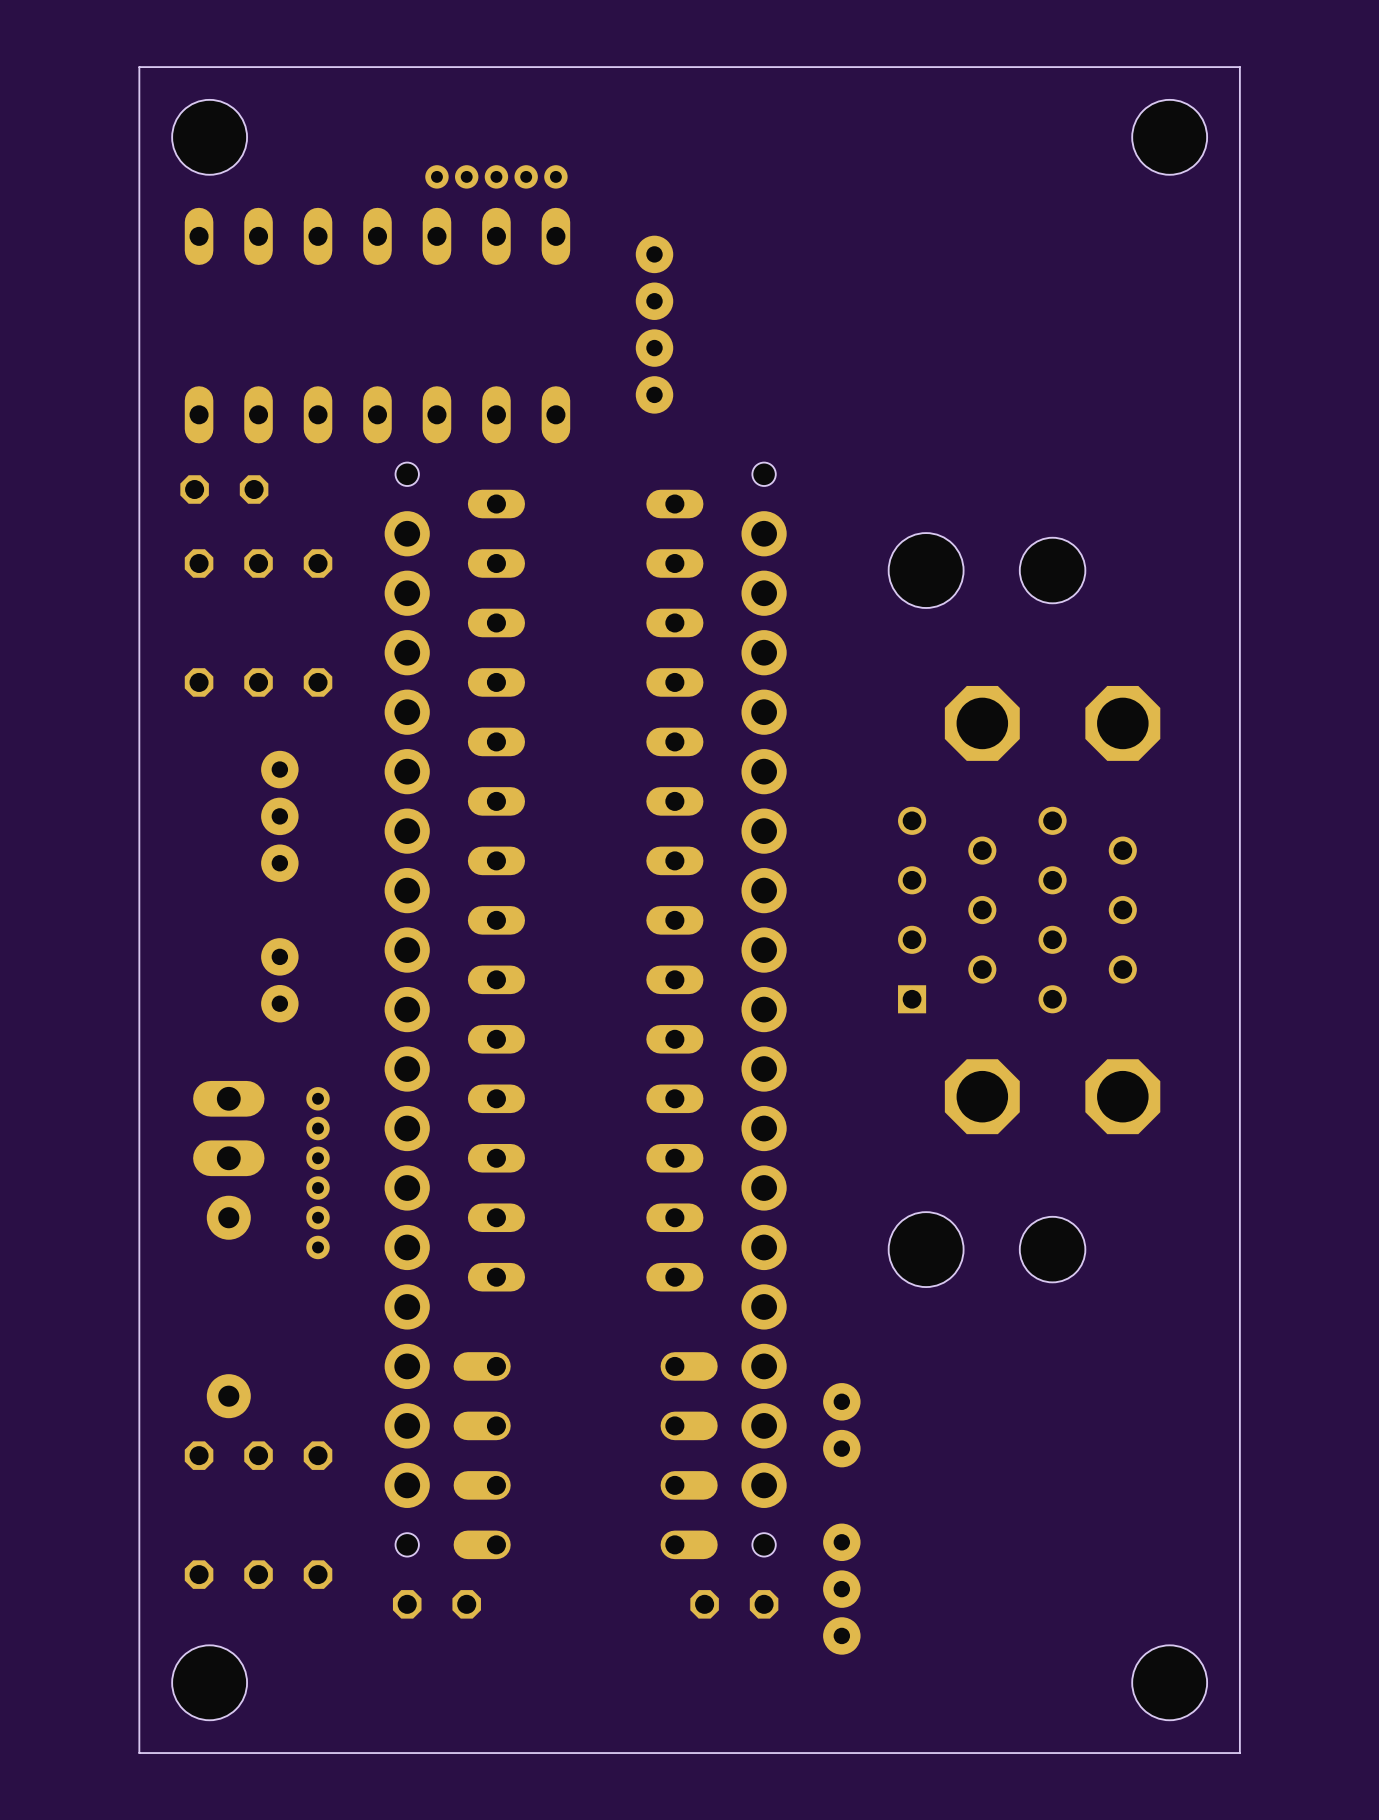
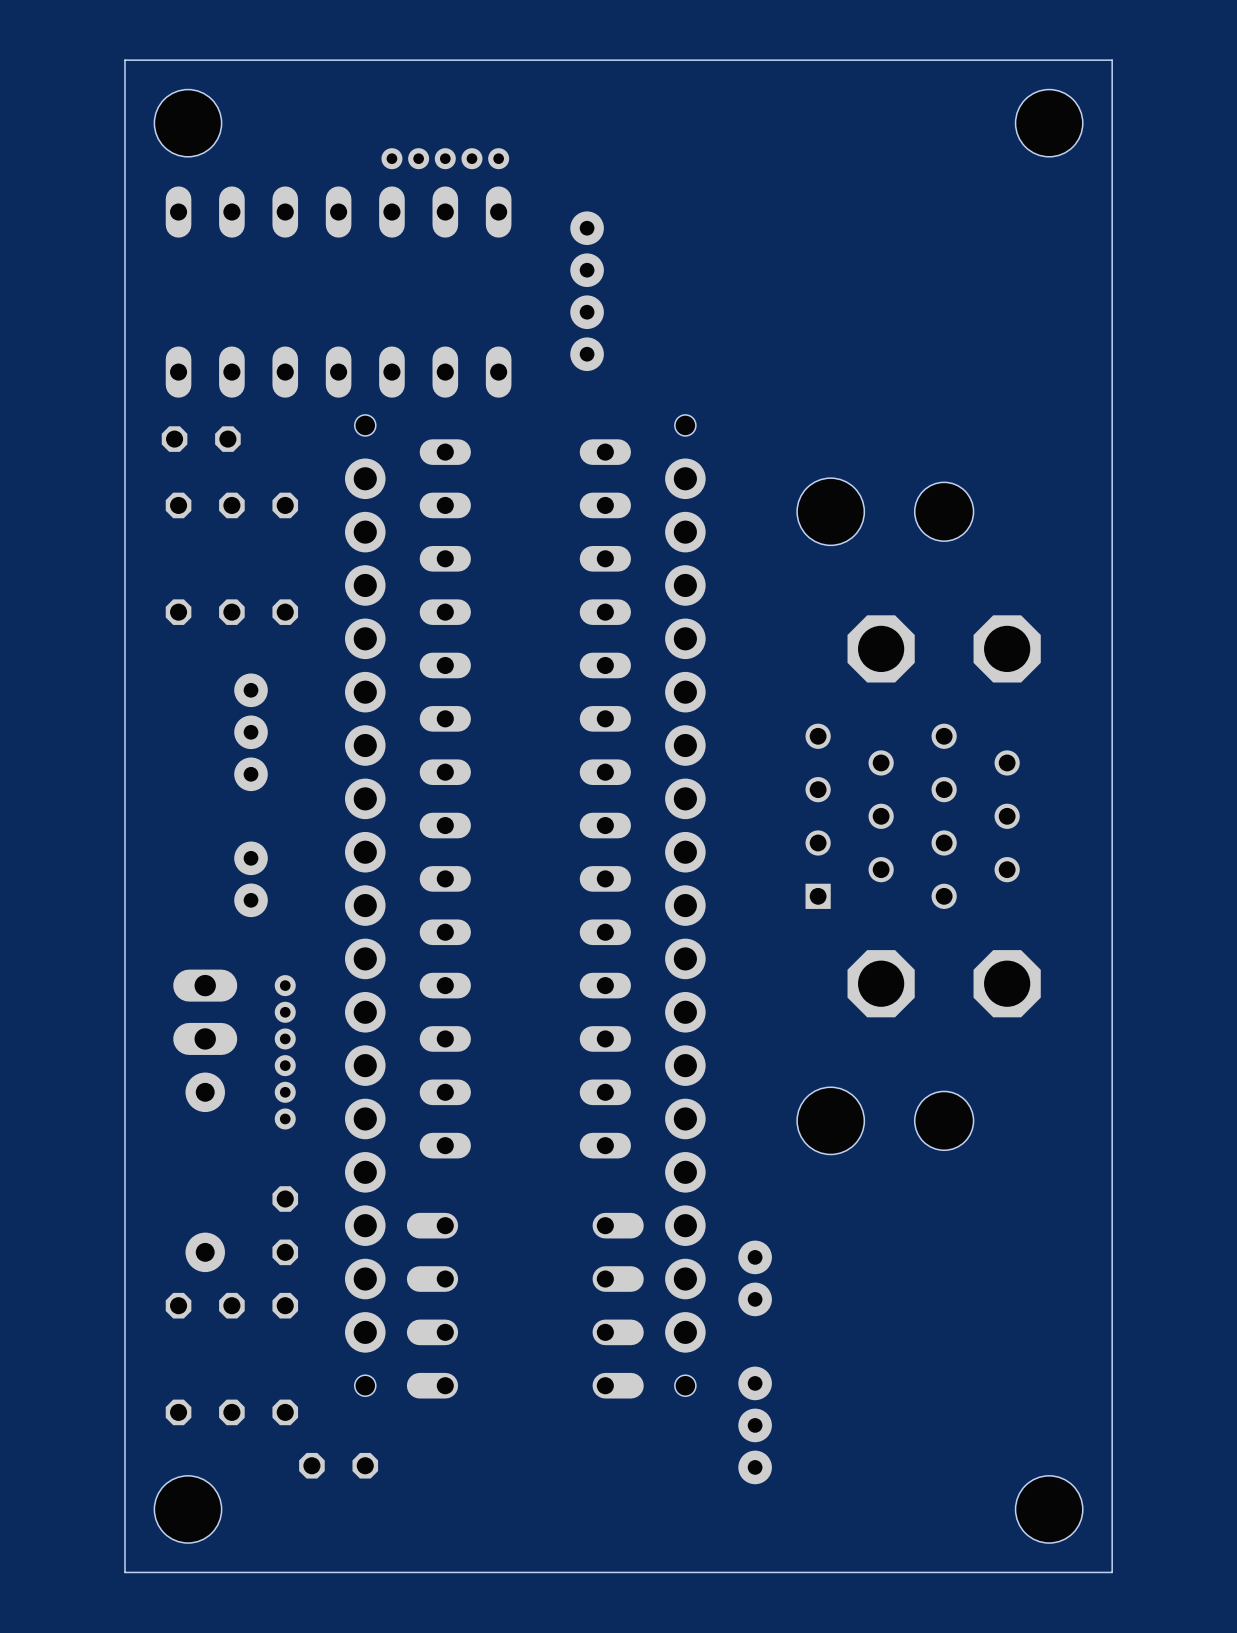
part: none -> (285, 1225)
part position: (436, 1604) -> (338, 1465)
part: (734, 1604) -> none

